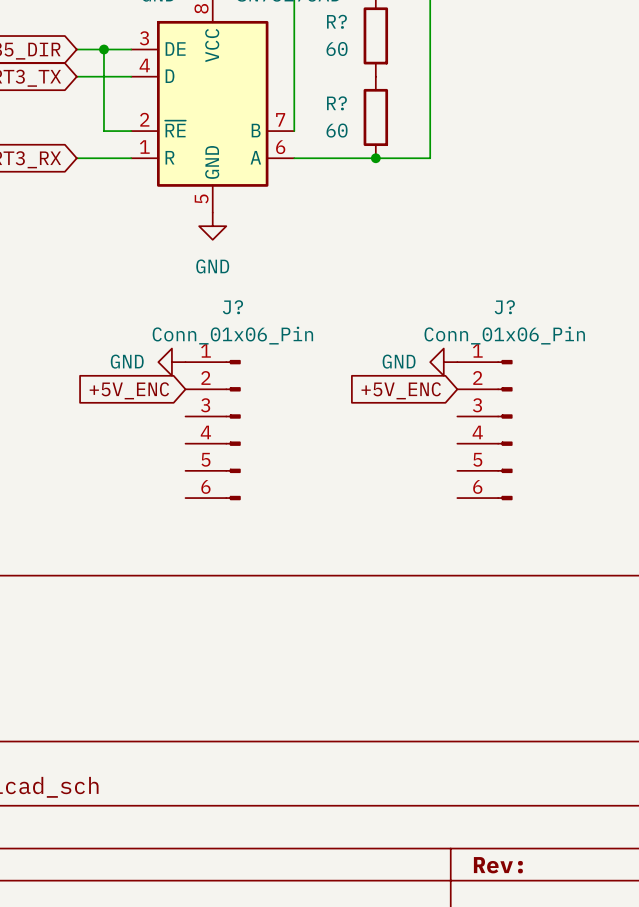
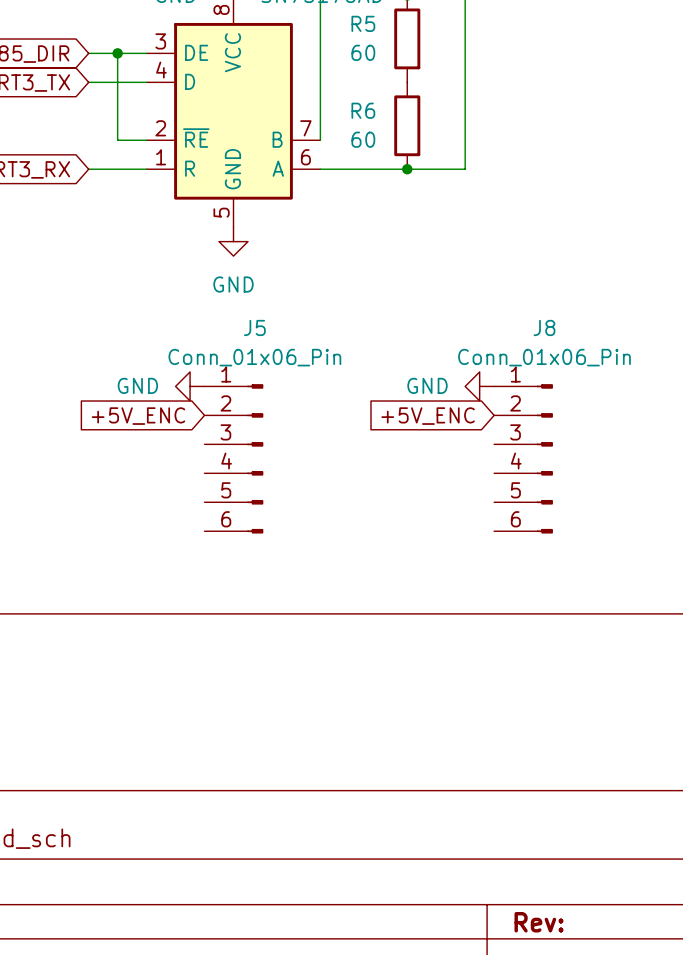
R? name: R? (336, 21) -> R5 (363, 23)
R? name: R? (336, 103) -> R6 (363, 110)
J? name: J? (232, 307) -> J5 (254, 327)
J? name: J? (504, 307) -> J8 (544, 327)

